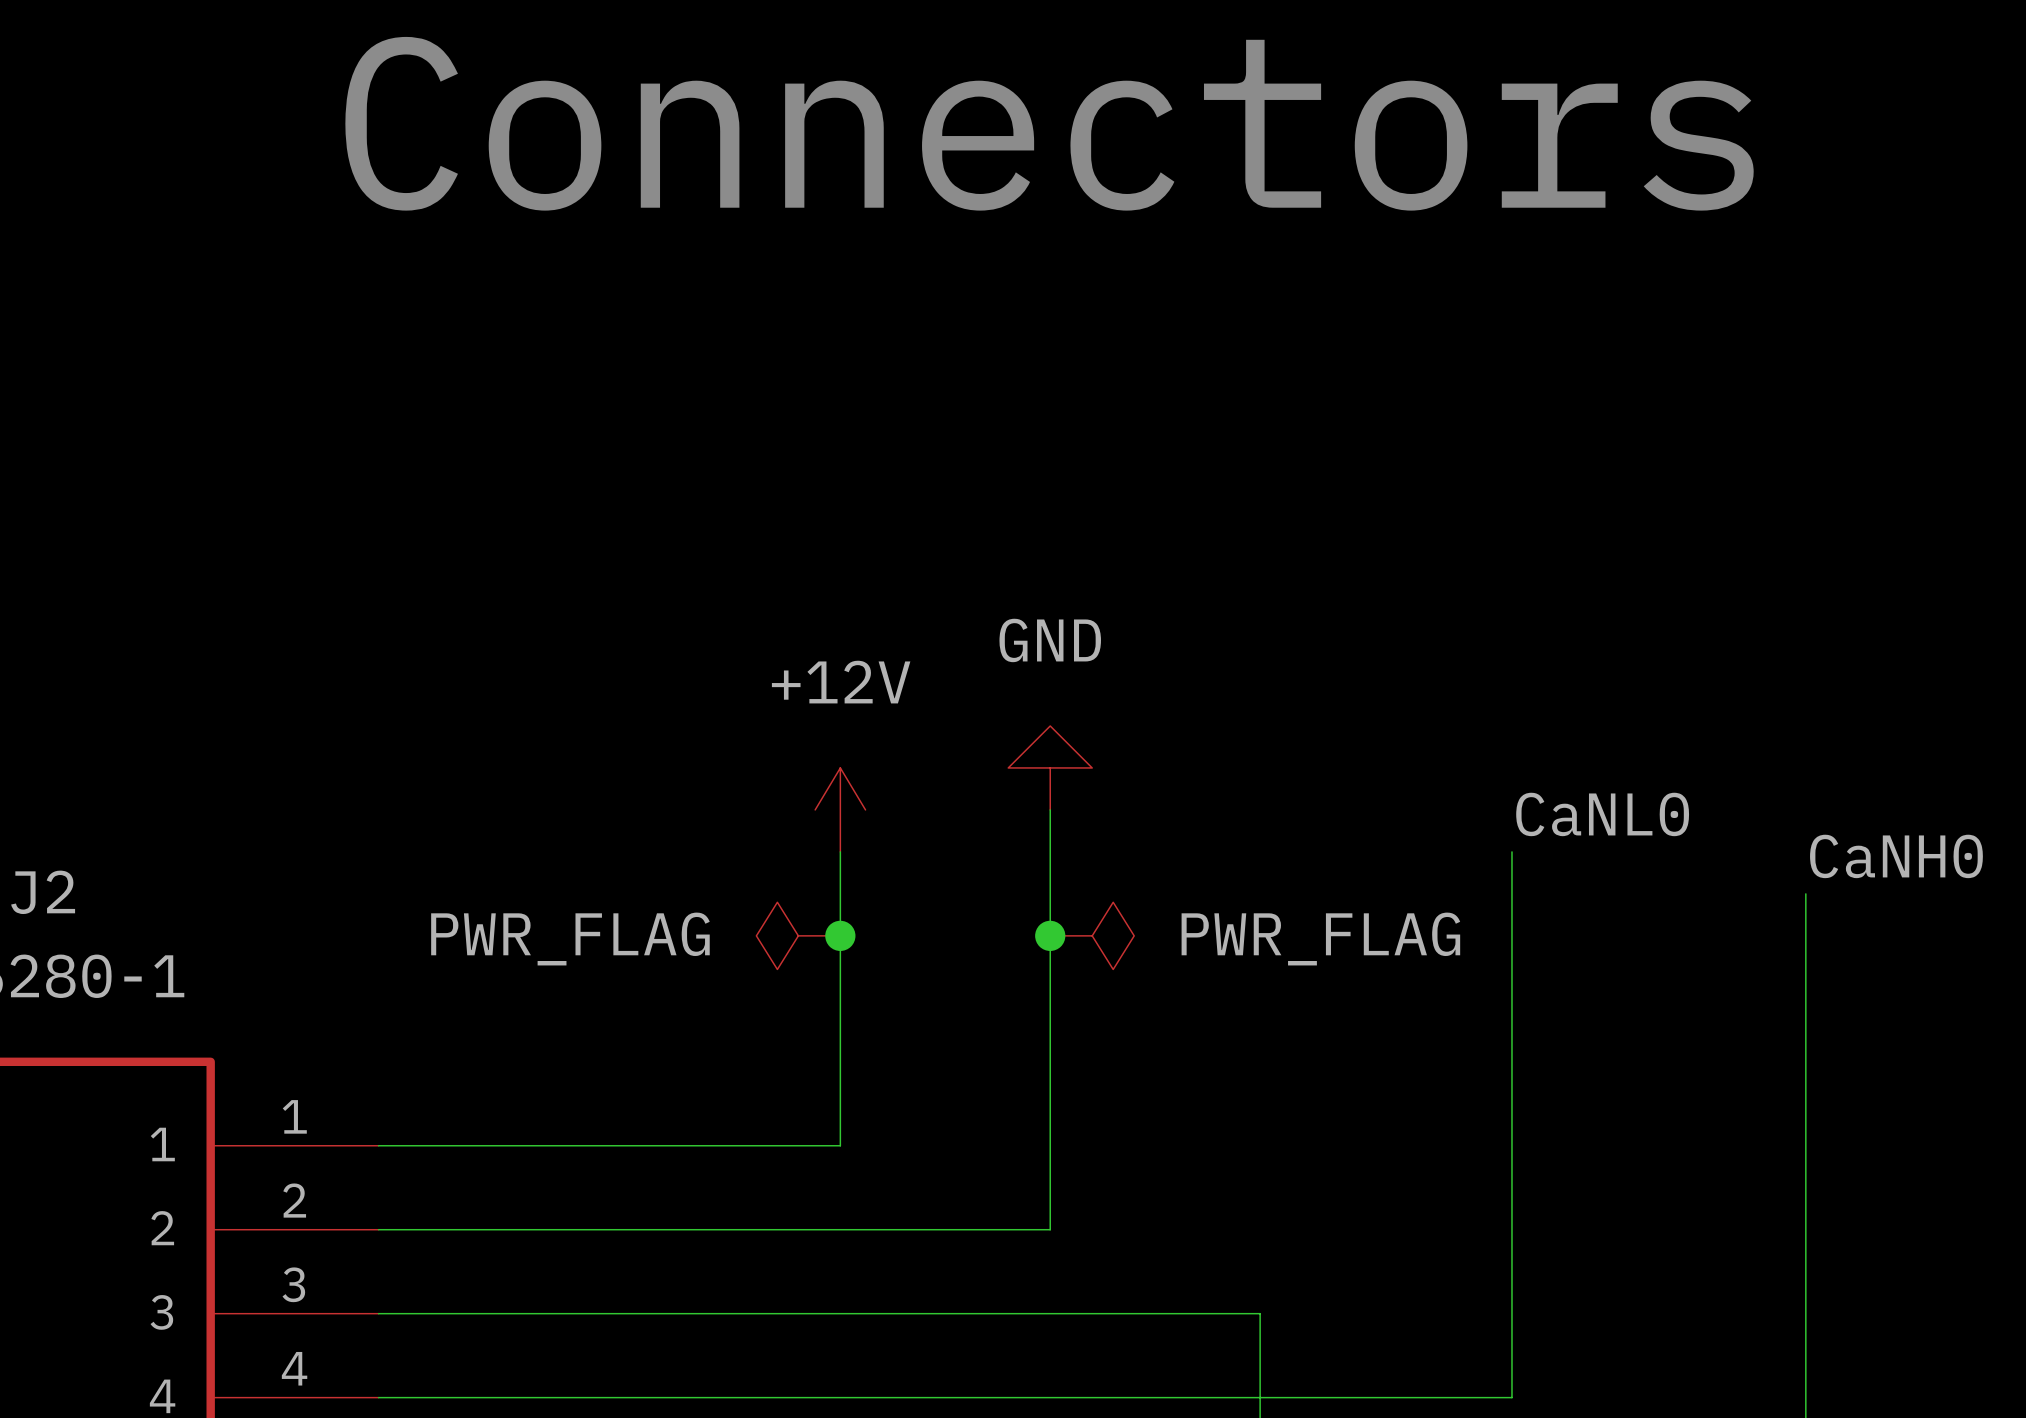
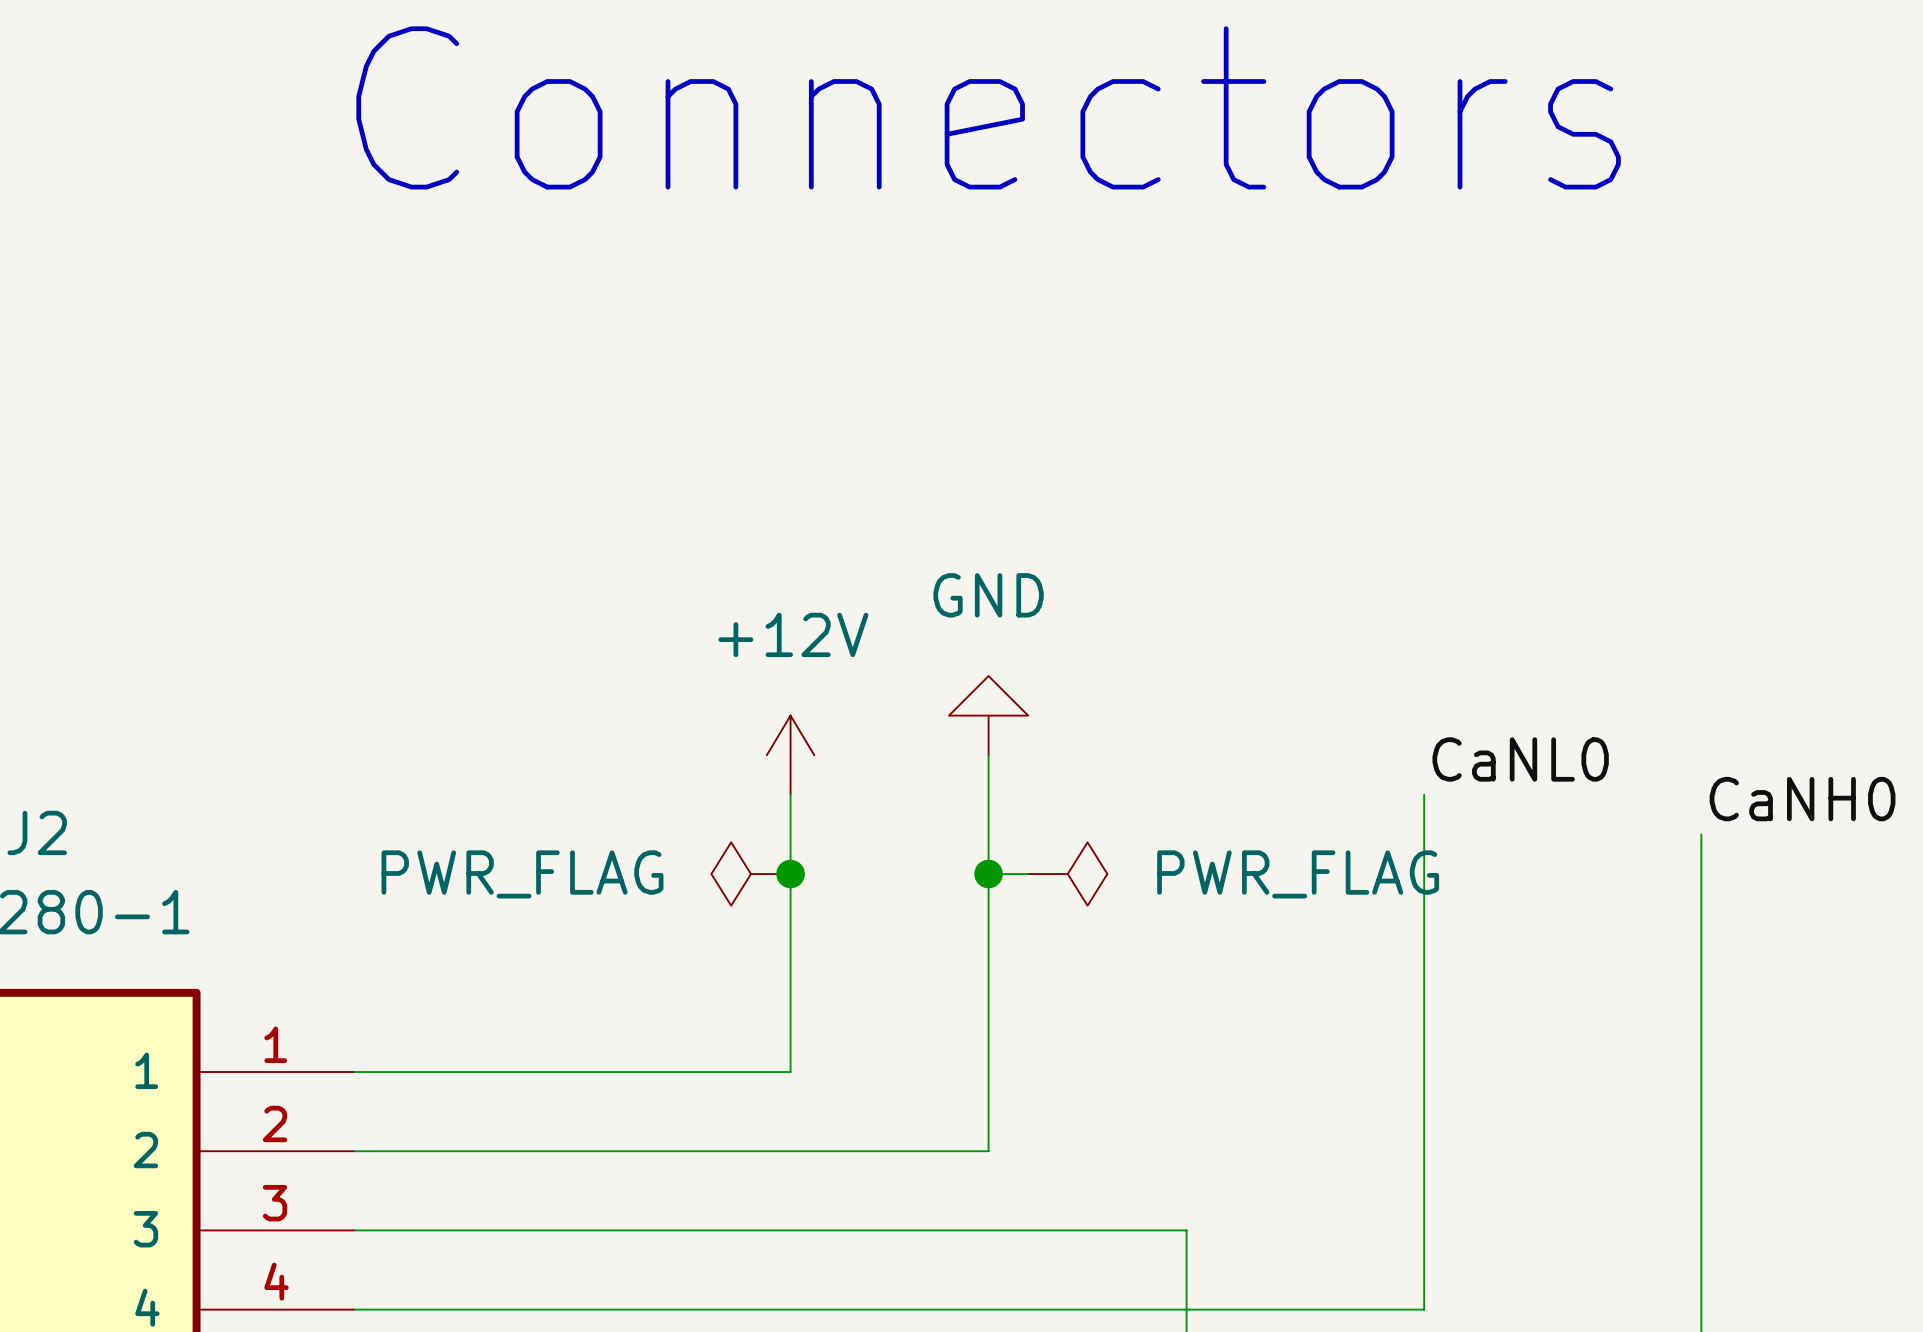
power symbol position: PWR_FLAG (1092, 935) -> PWR_FLAG (1067, 874)

